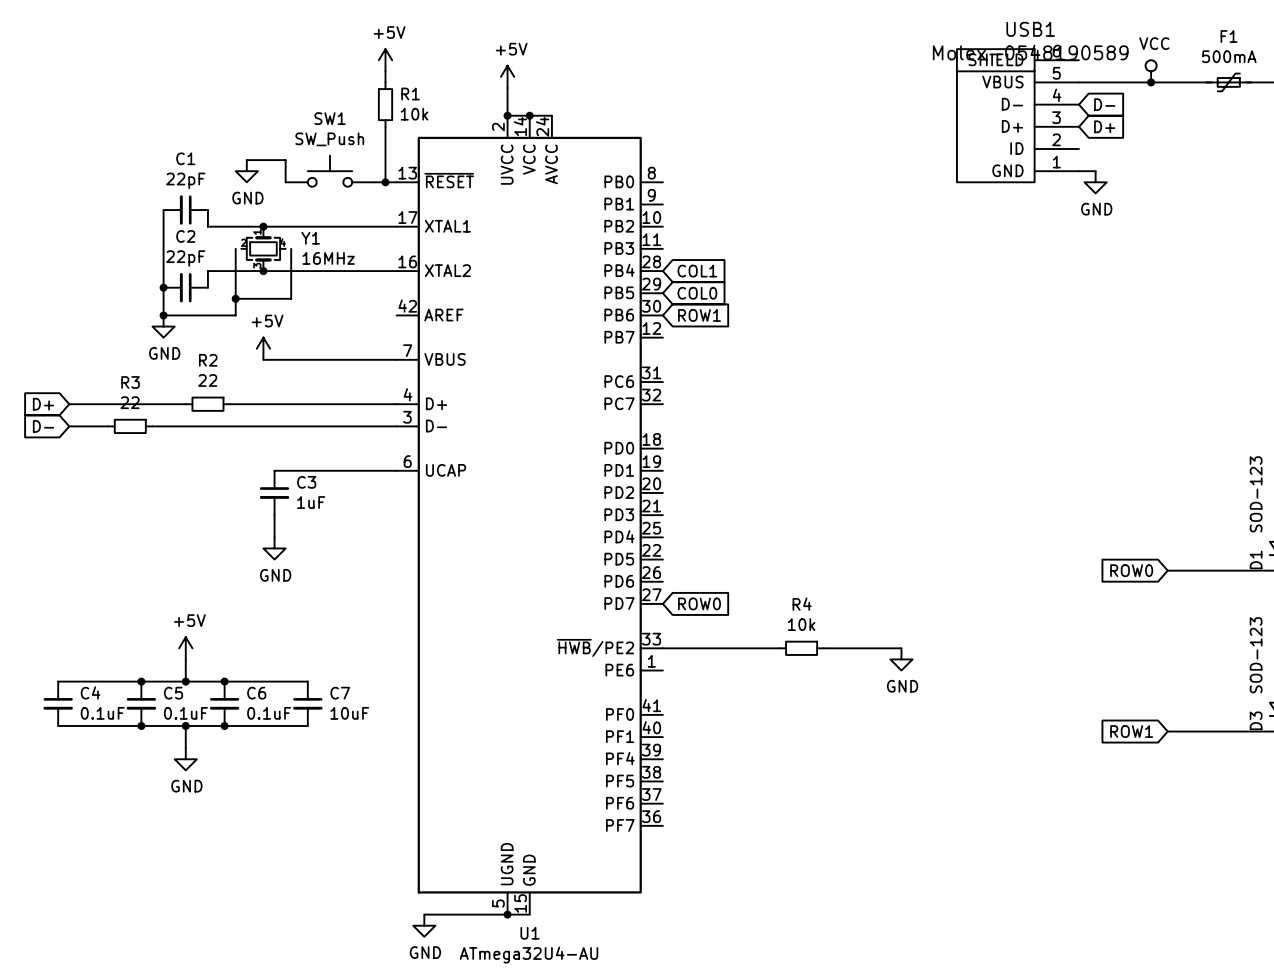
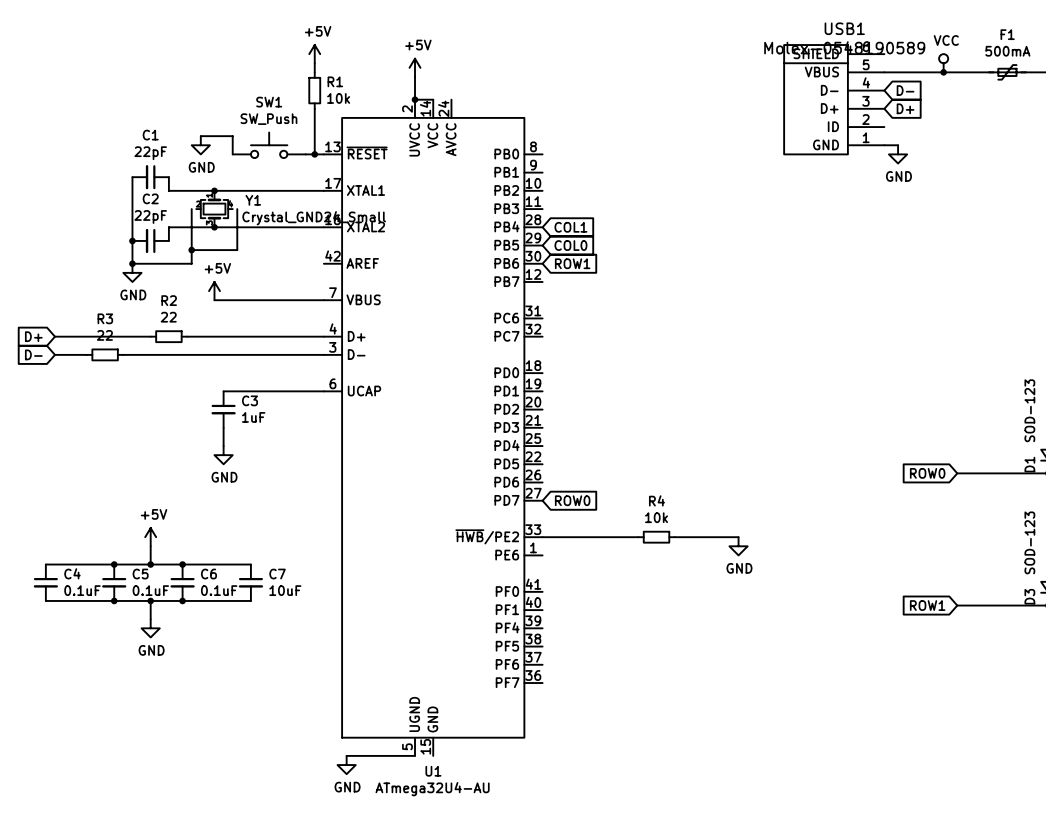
wire: (529, 115) (551, 115) -> none
junction: (529, 115) -> none
Y1 value: 16MHz (328, 258) -> Crystal_GND24_Small (314, 218)
wire: (507, 914) (529, 914) -> none
junction: (507, 914) -> none

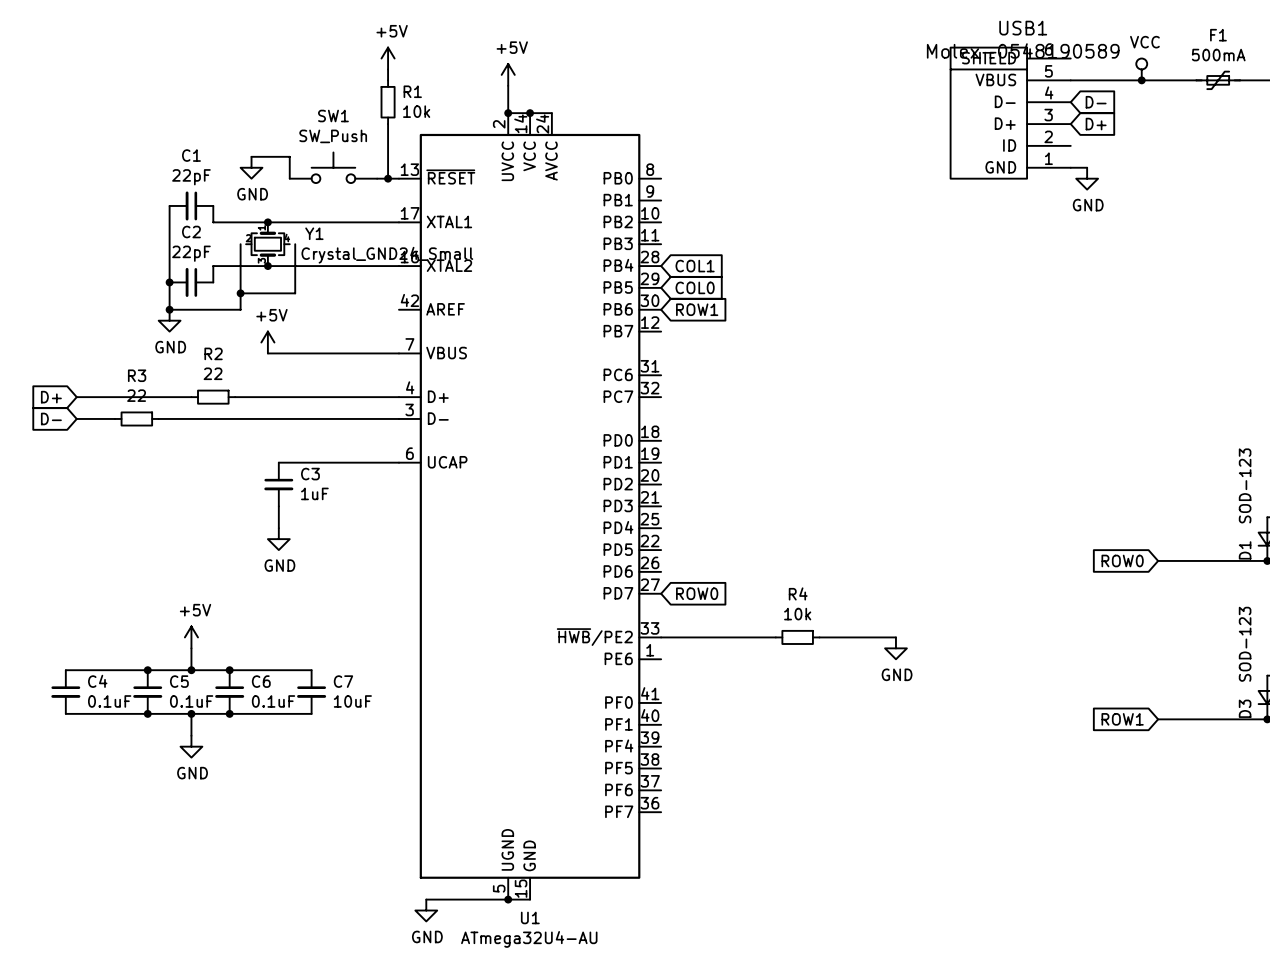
wire: none -> (530, 113) (551, 113)
junction: none -> (530, 113)
wire: none -> (508, 899) (530, 899)
junction: none -> (508, 899)

